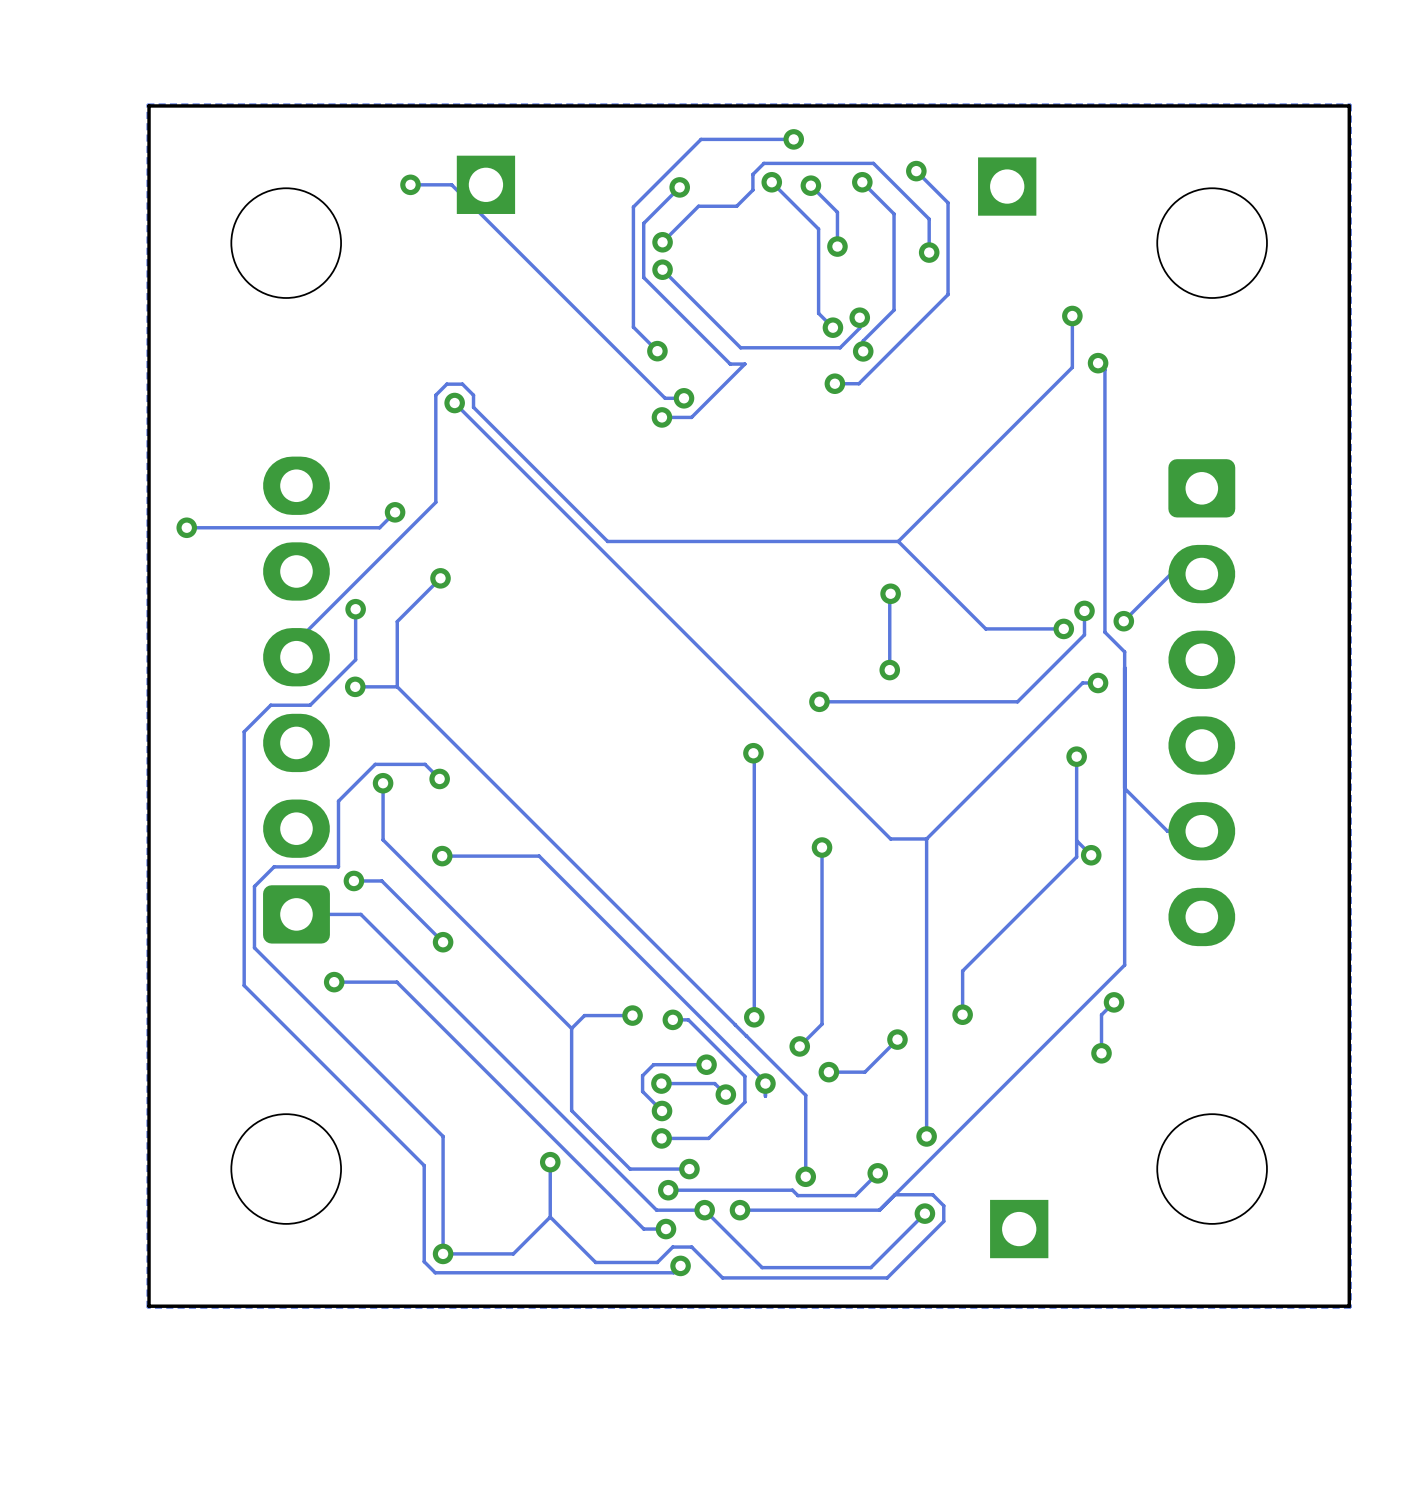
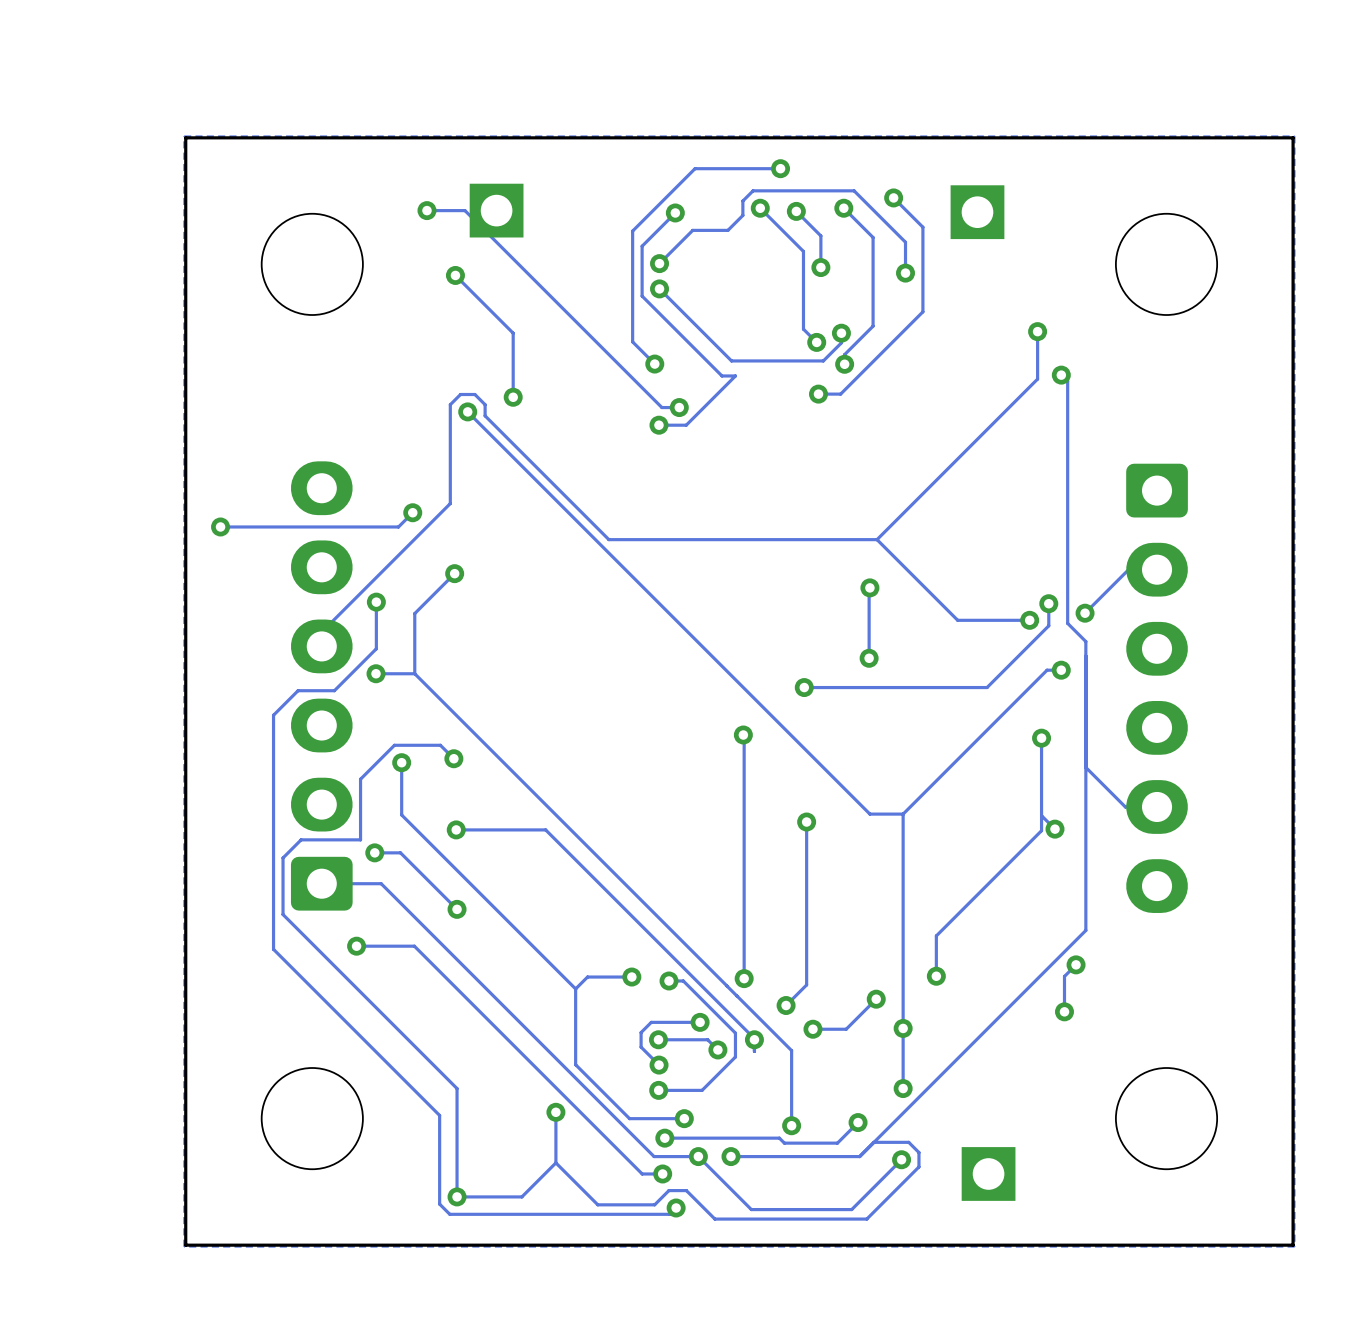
track: none -> (455, 275) (513, 333) (513, 397)
via: none -> (455, 275)
via: none -> (513, 397)
via: none -> (903, 1028)

